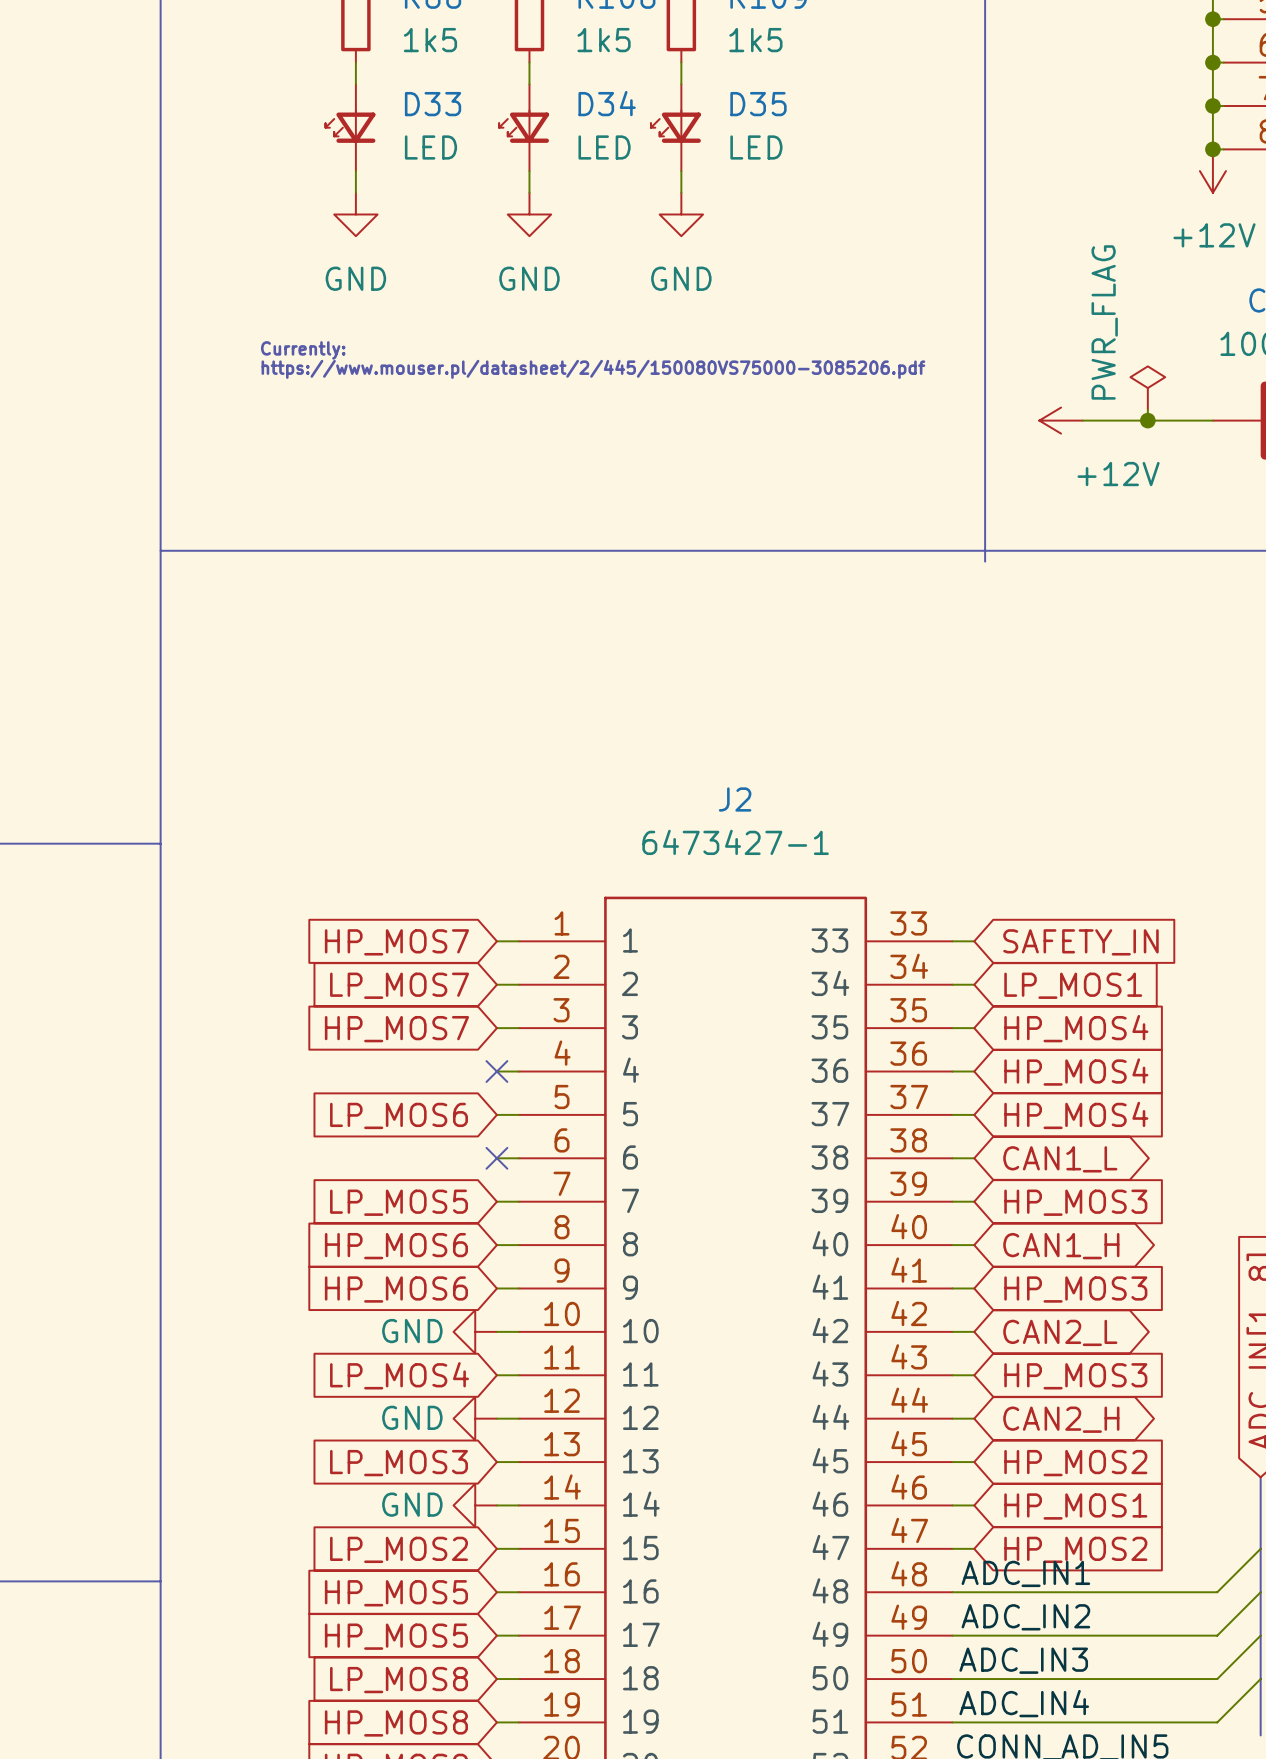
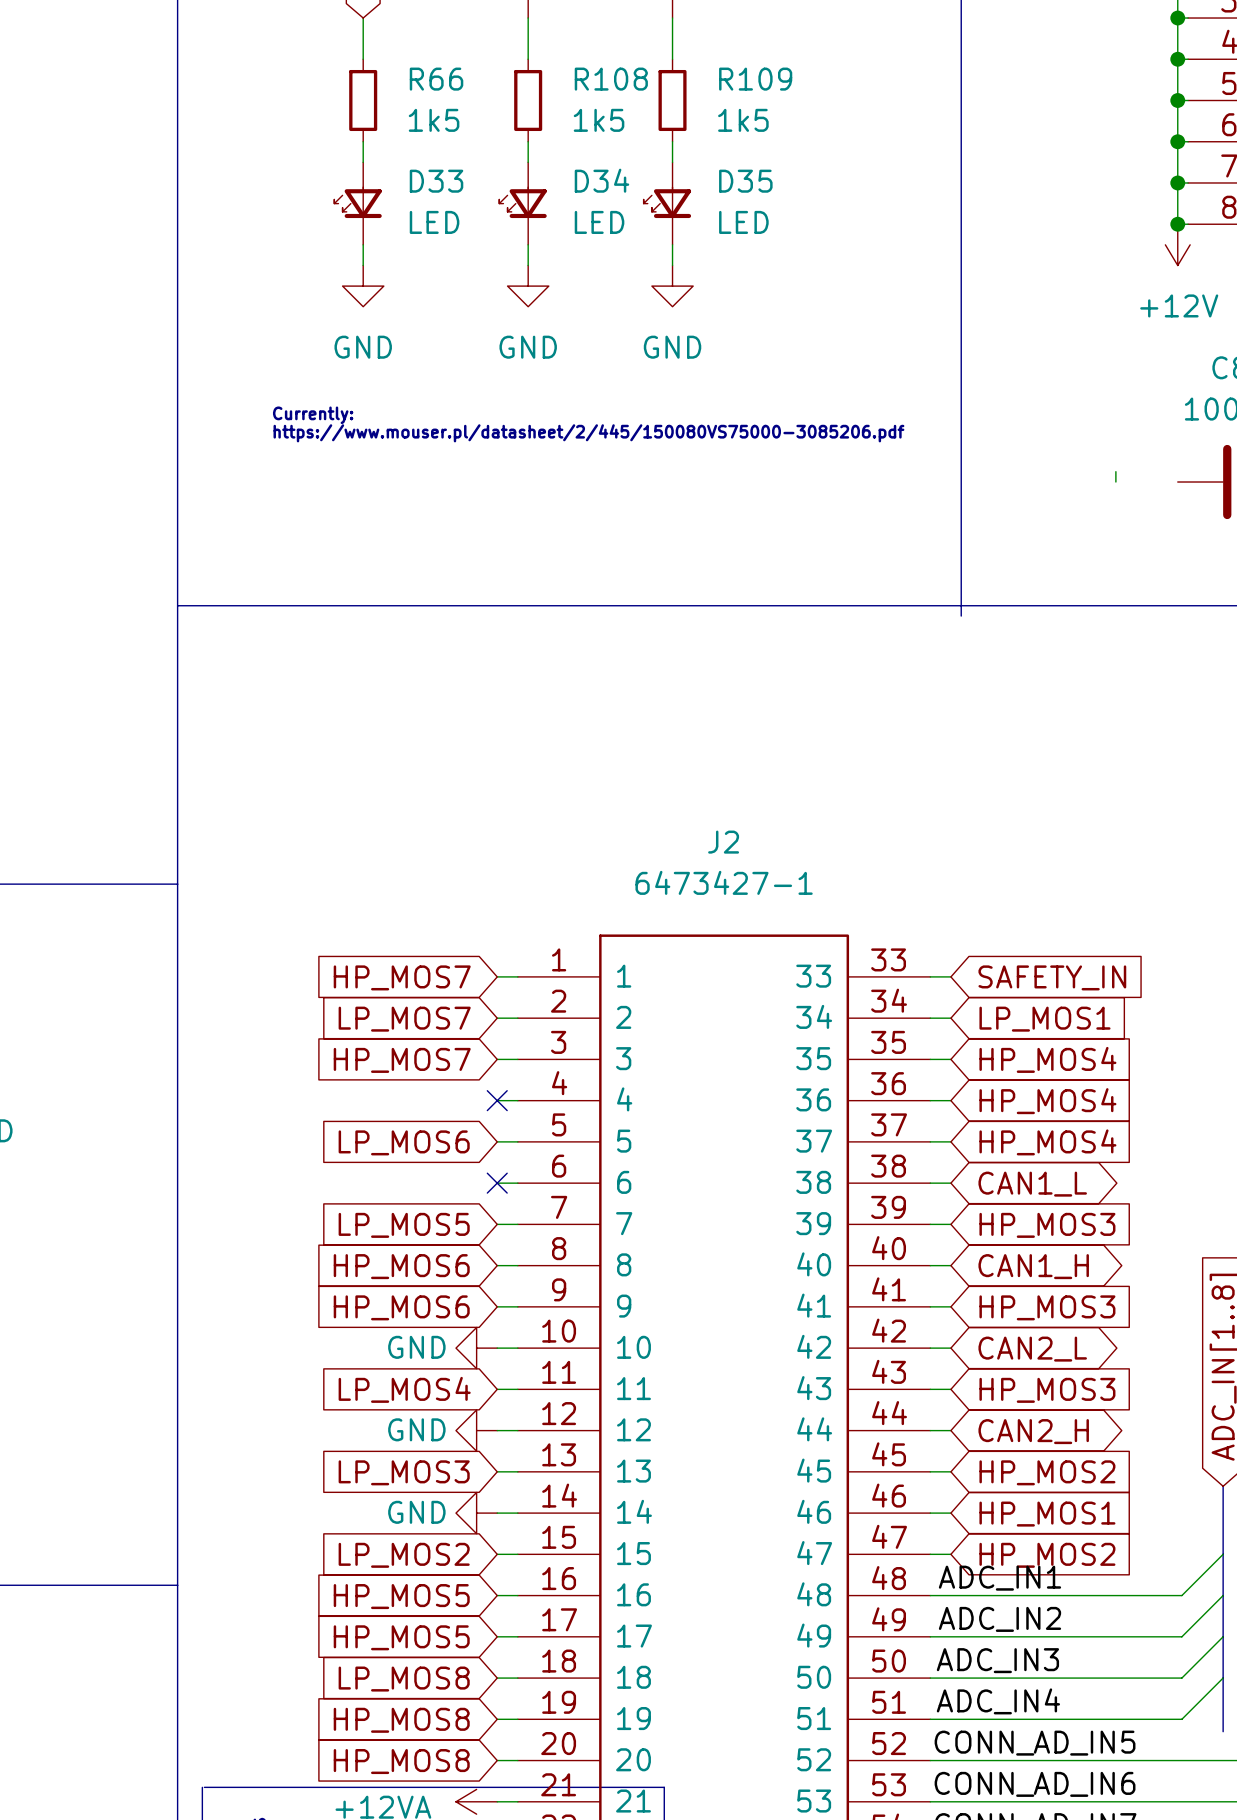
power symbol: PWR_FLAG (1147, 388) -> none
power symbol: +12V (1061, 420) -> none
wire: (1082, 420) (1212, 420) -> none
junction: (1147, 420) -> none

